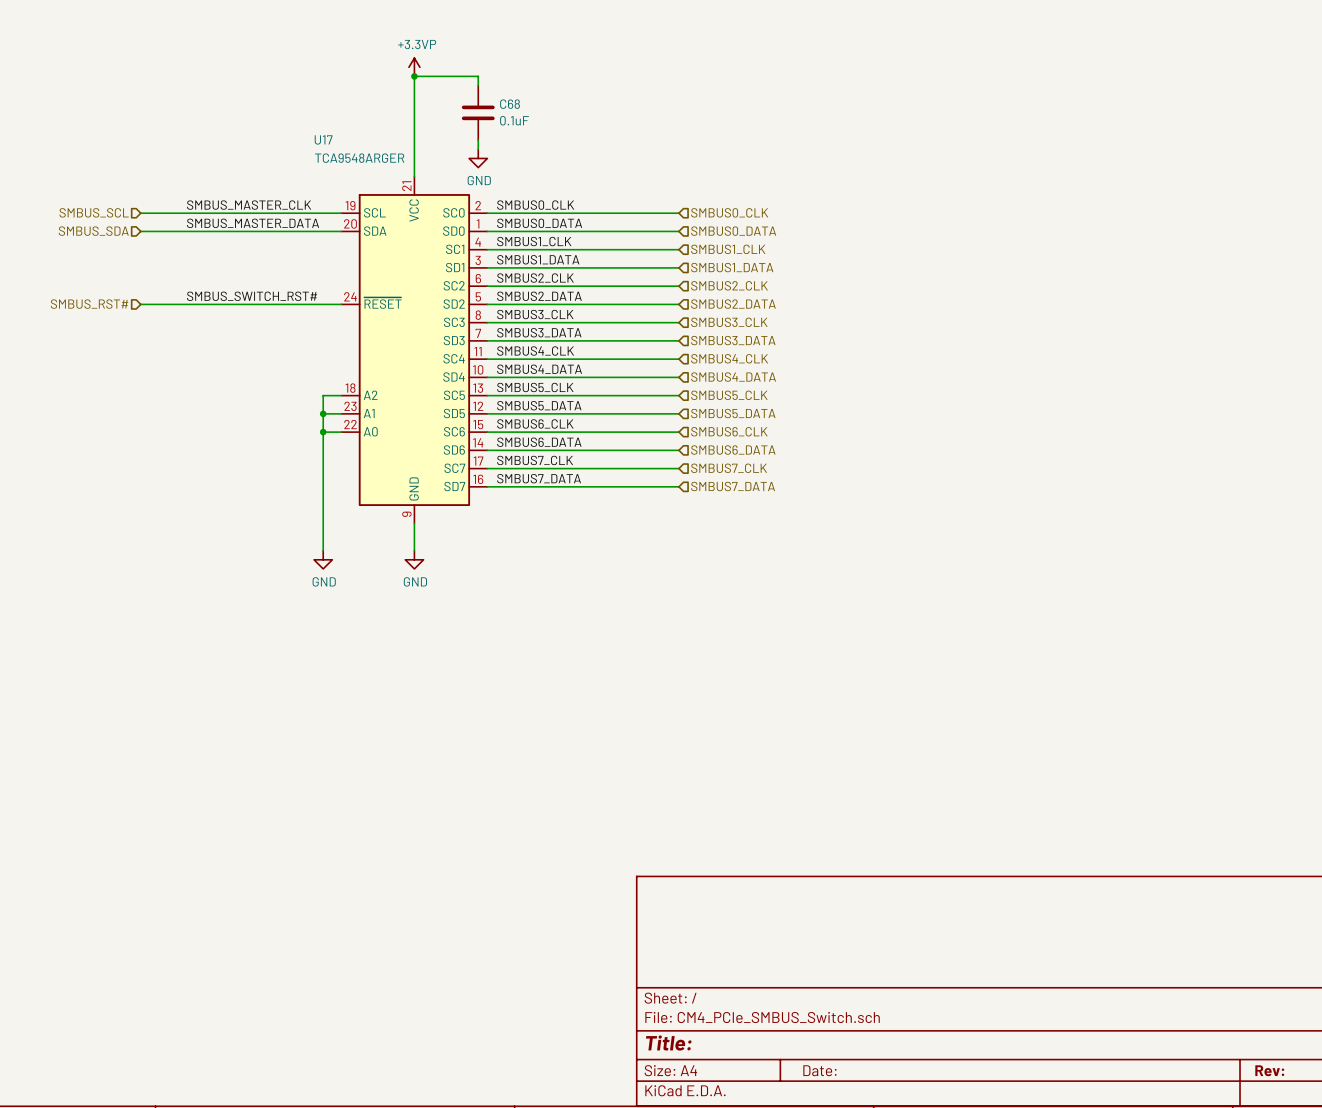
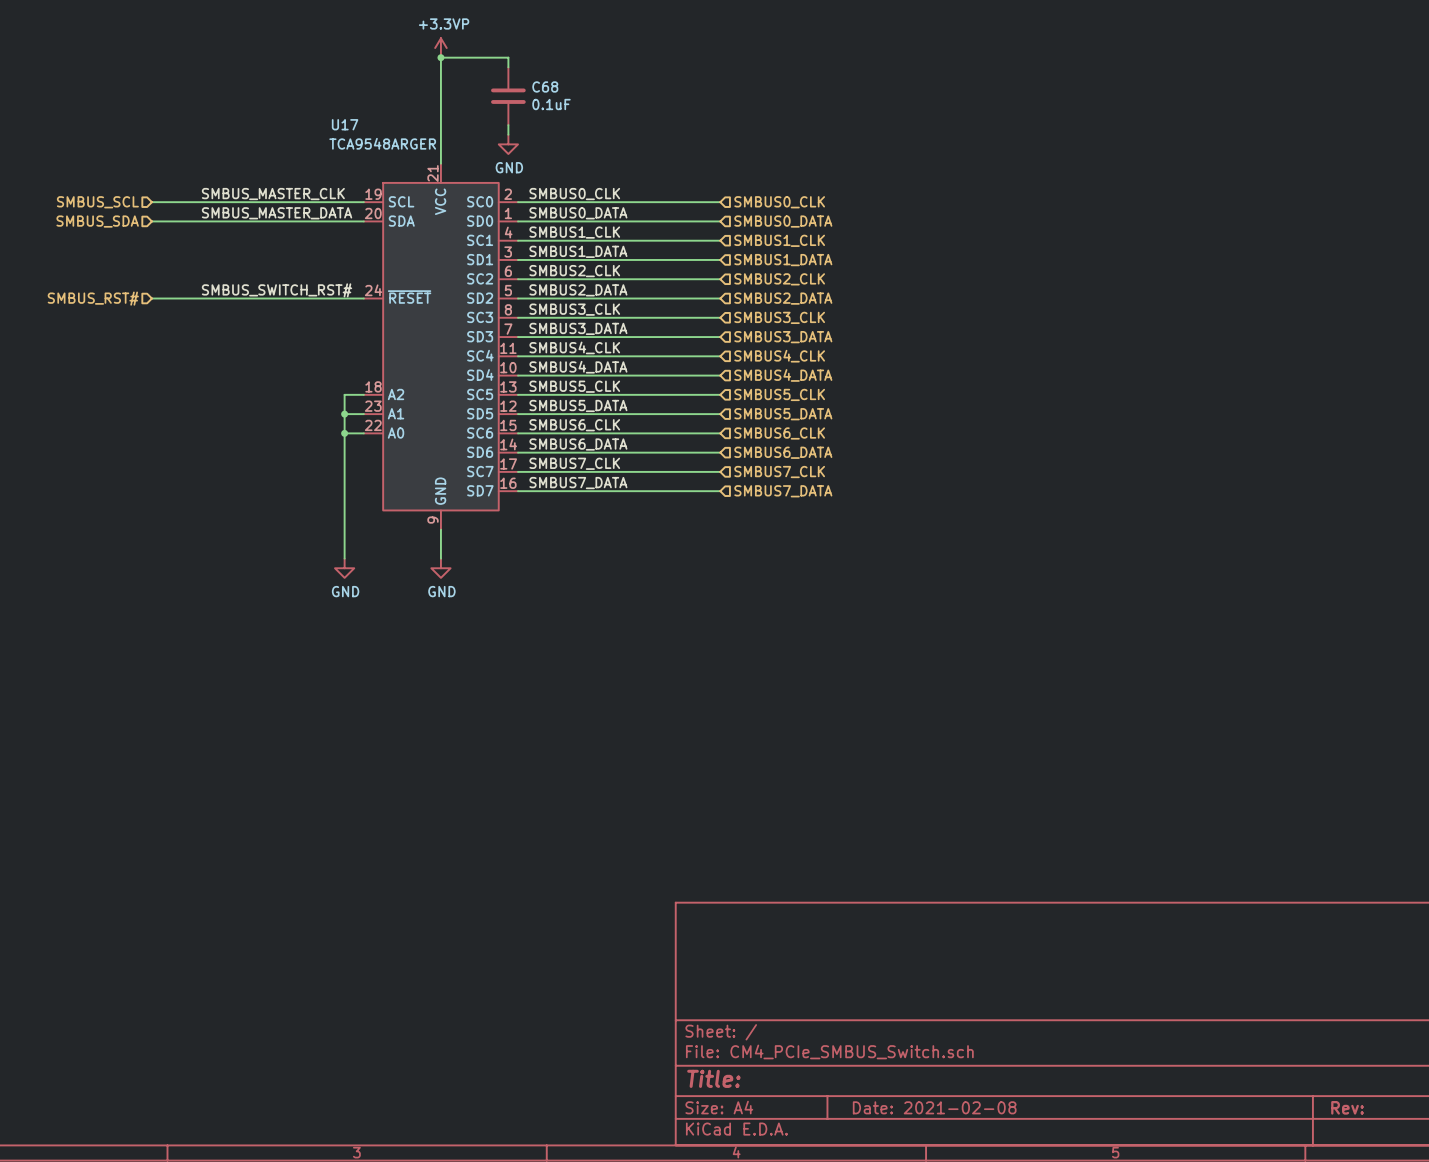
title block: Date: (819, 1070) -> Date: 2021-02-08 (934, 1107)

